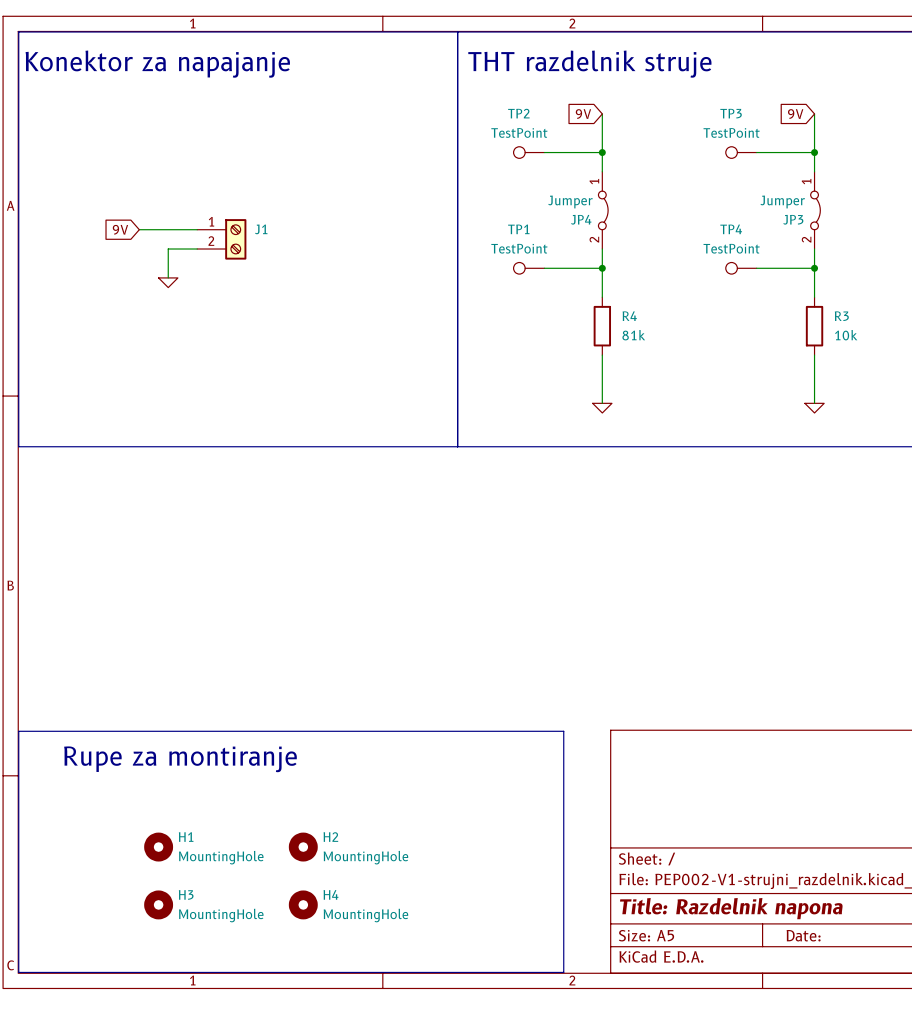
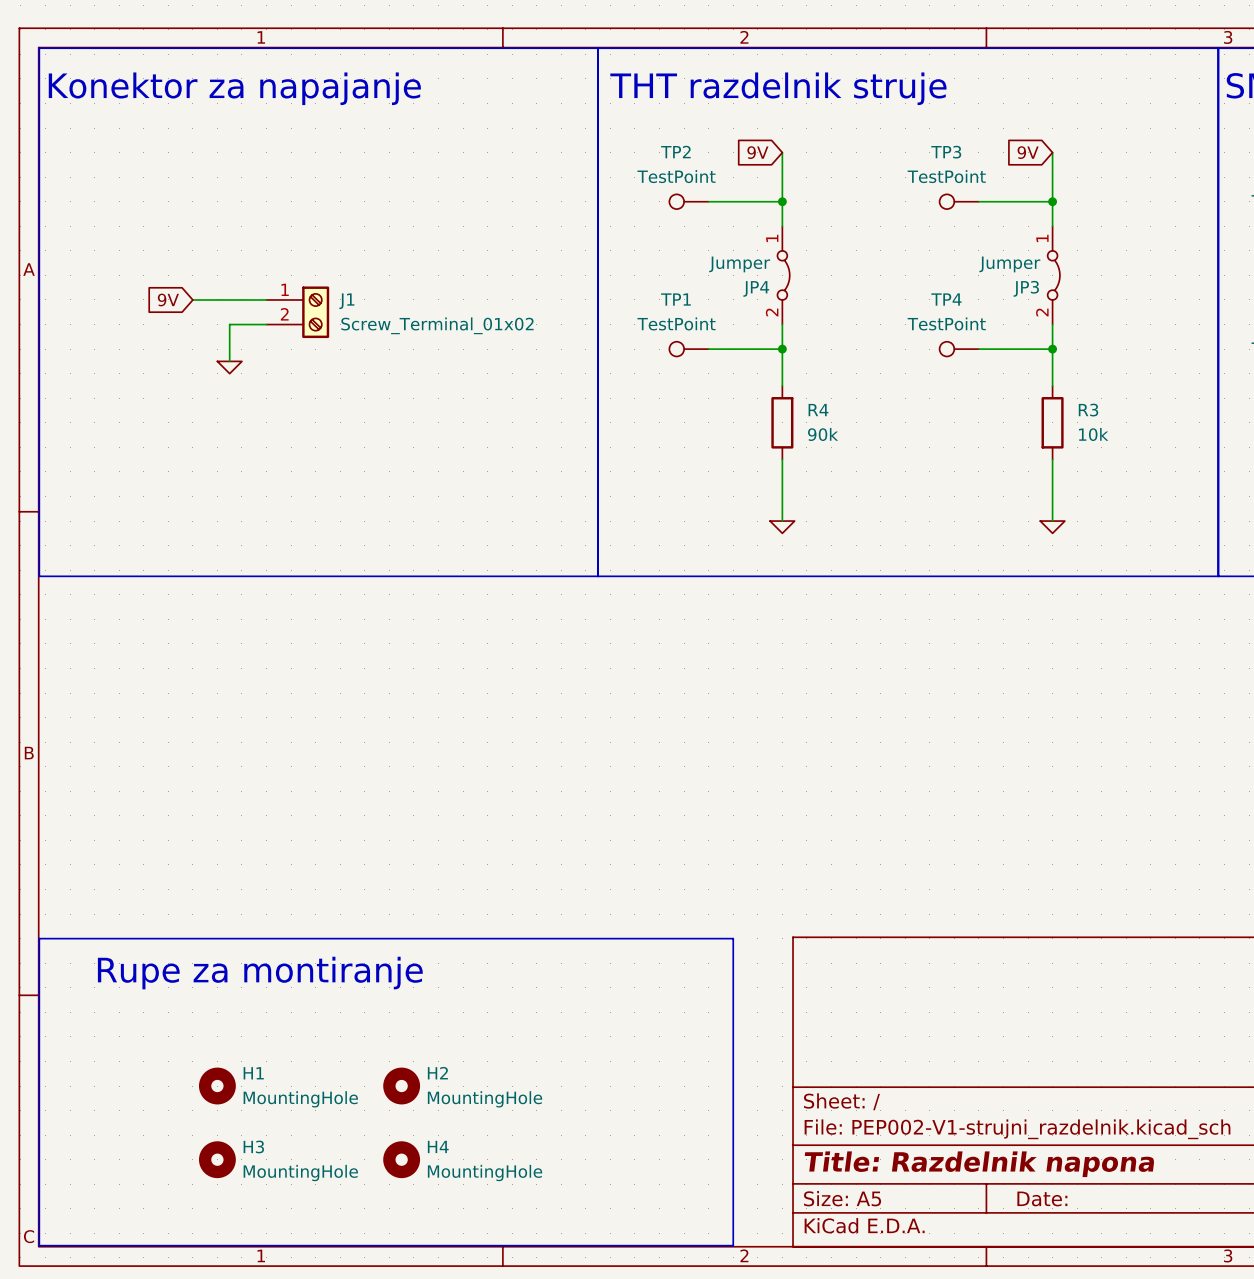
J1 value: none -> Screw_Terminal_01x02 (437, 325)
R4 value: 81k (633, 335) -> 90k (823, 434)

